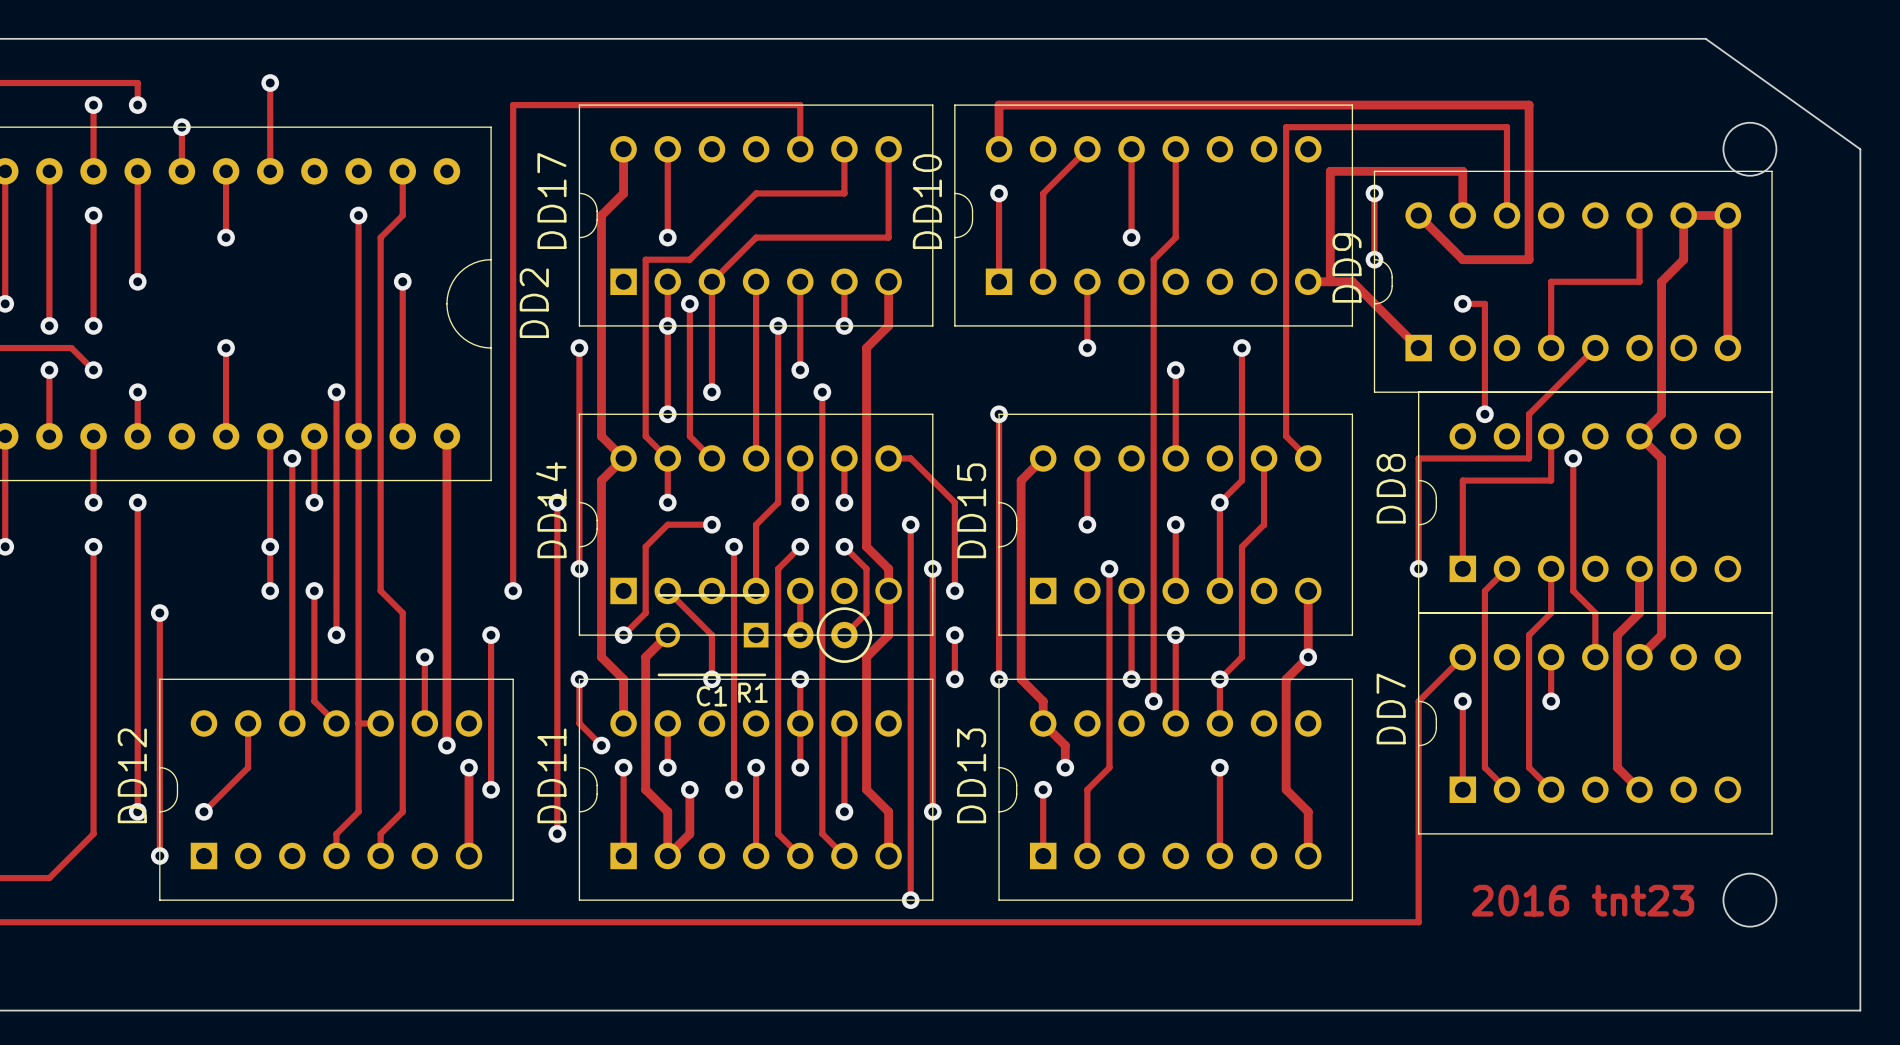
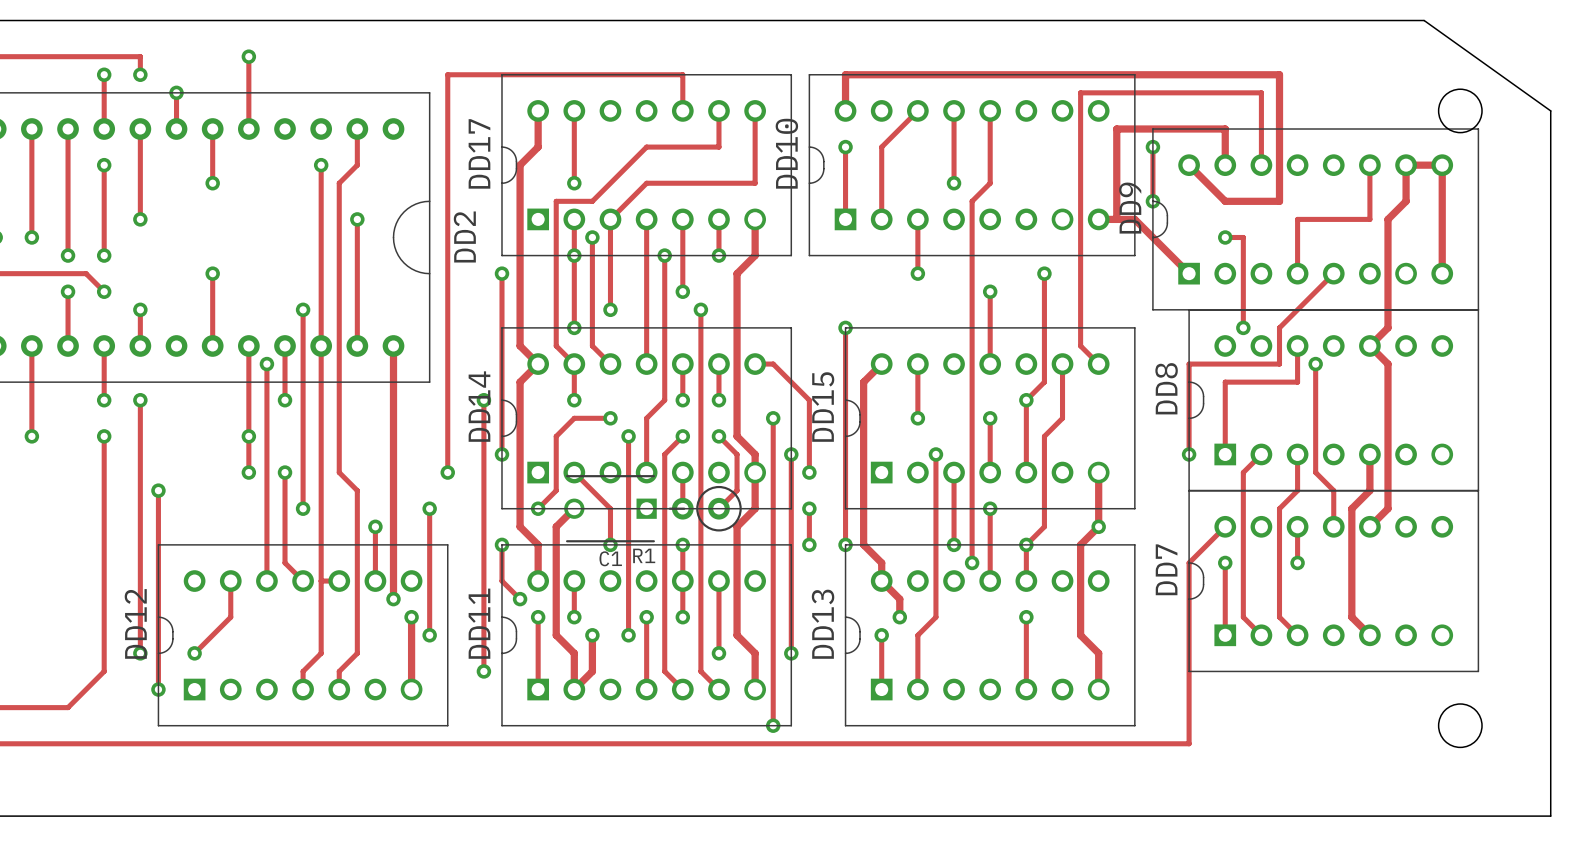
text: 2016 tnt23 (1583, 900) -> none

